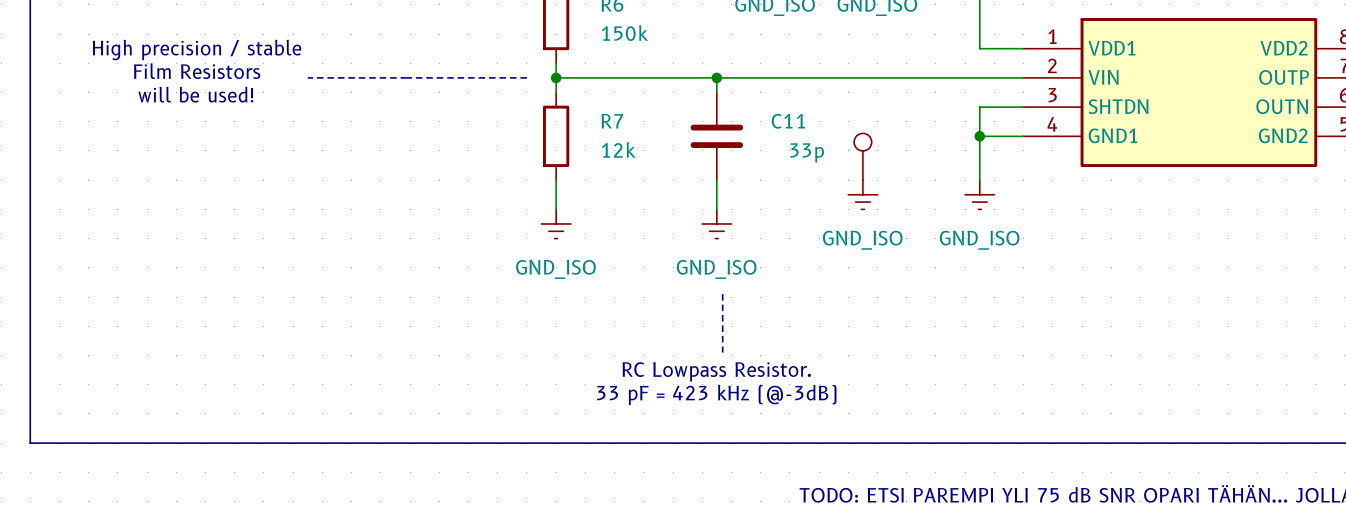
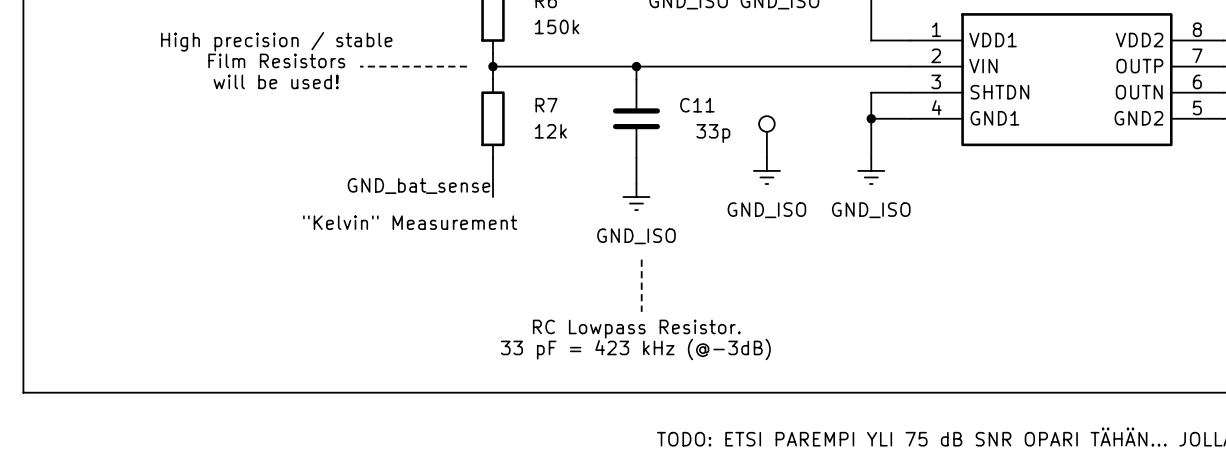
text position: High precision / stable (196, 50) -> High precision / stable (276, 41)
text position: Film Resistors (197, 71) -> Film Resistors (276, 60)
line: (307, 77) (407, 77) -> none
text position: will be used! (195, 94) -> will be used! (276, 81)
label: none -> GND_bat_sense (418, 186)
power symbol: GND_ISO (556, 223) -> none
text: none -> "Kelvin" Measurement (410, 222)

